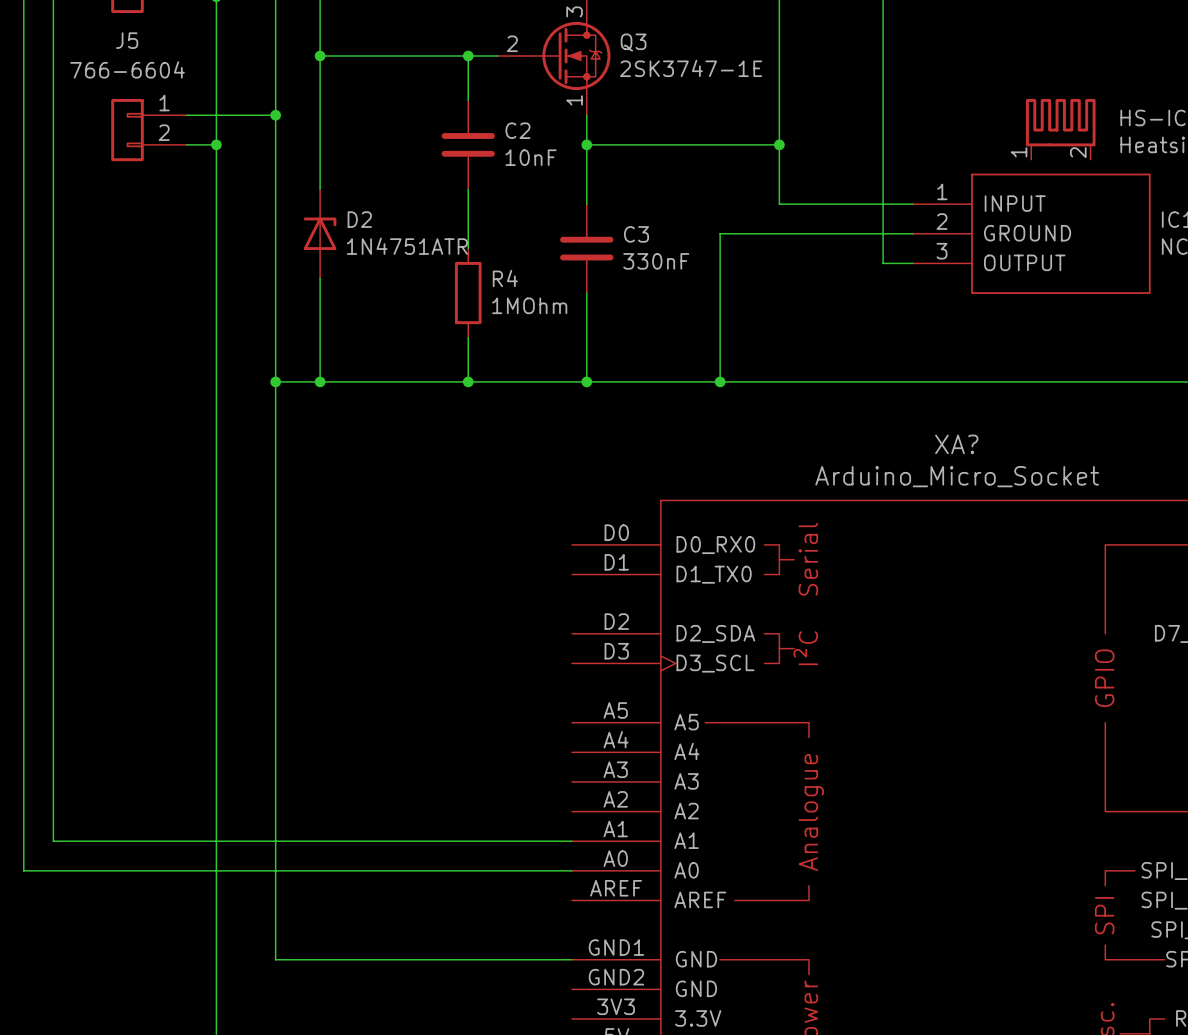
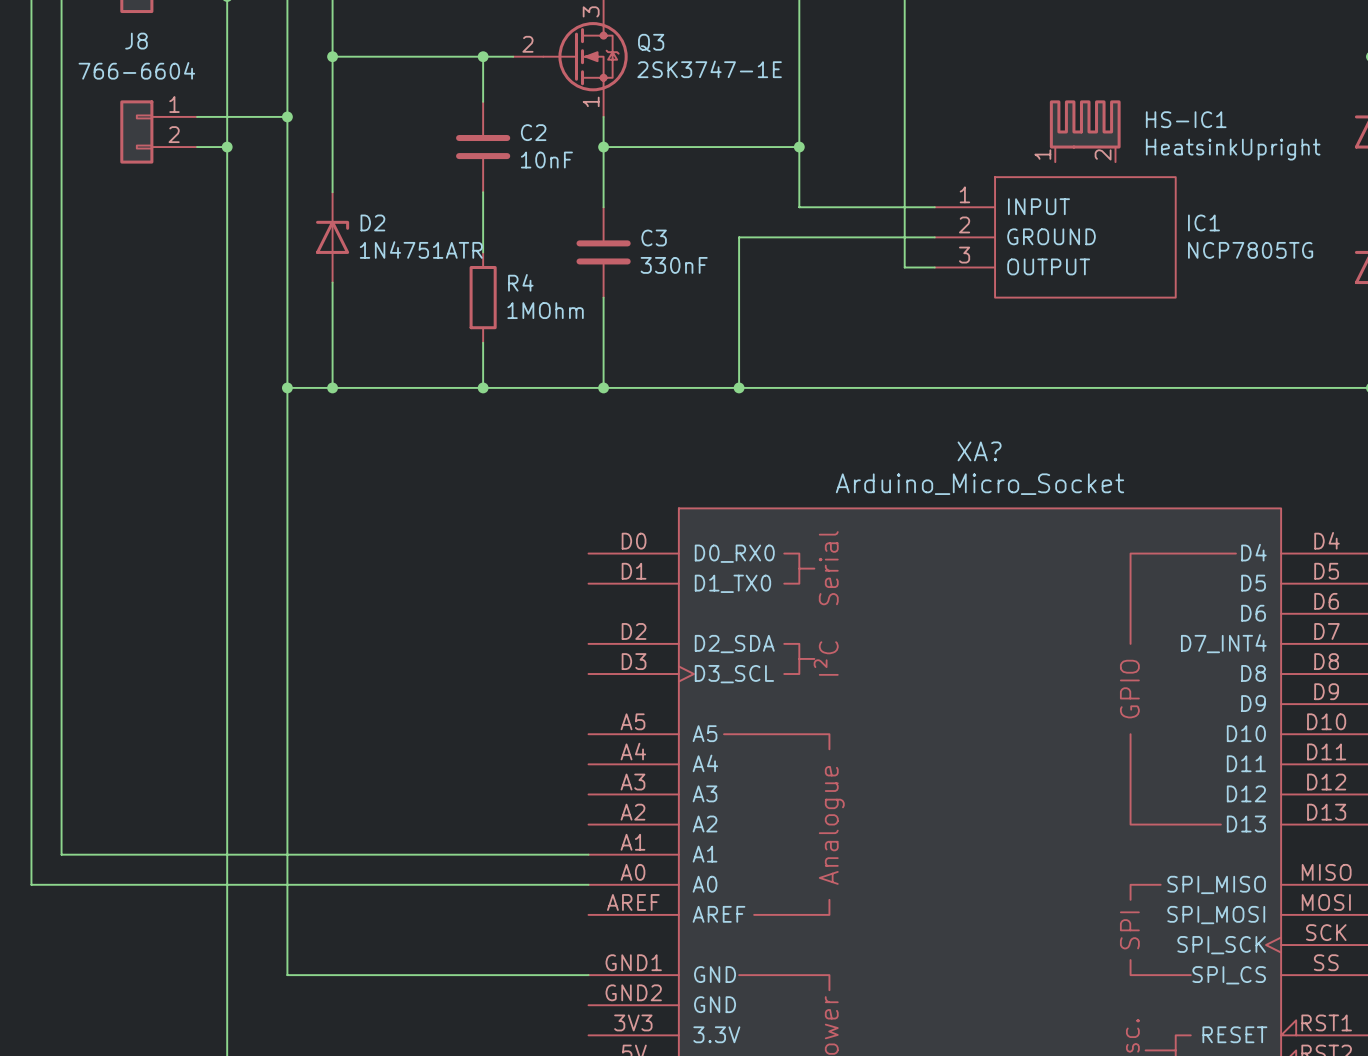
J5 name: J5 (127, 40) -> J8 (136, 41)

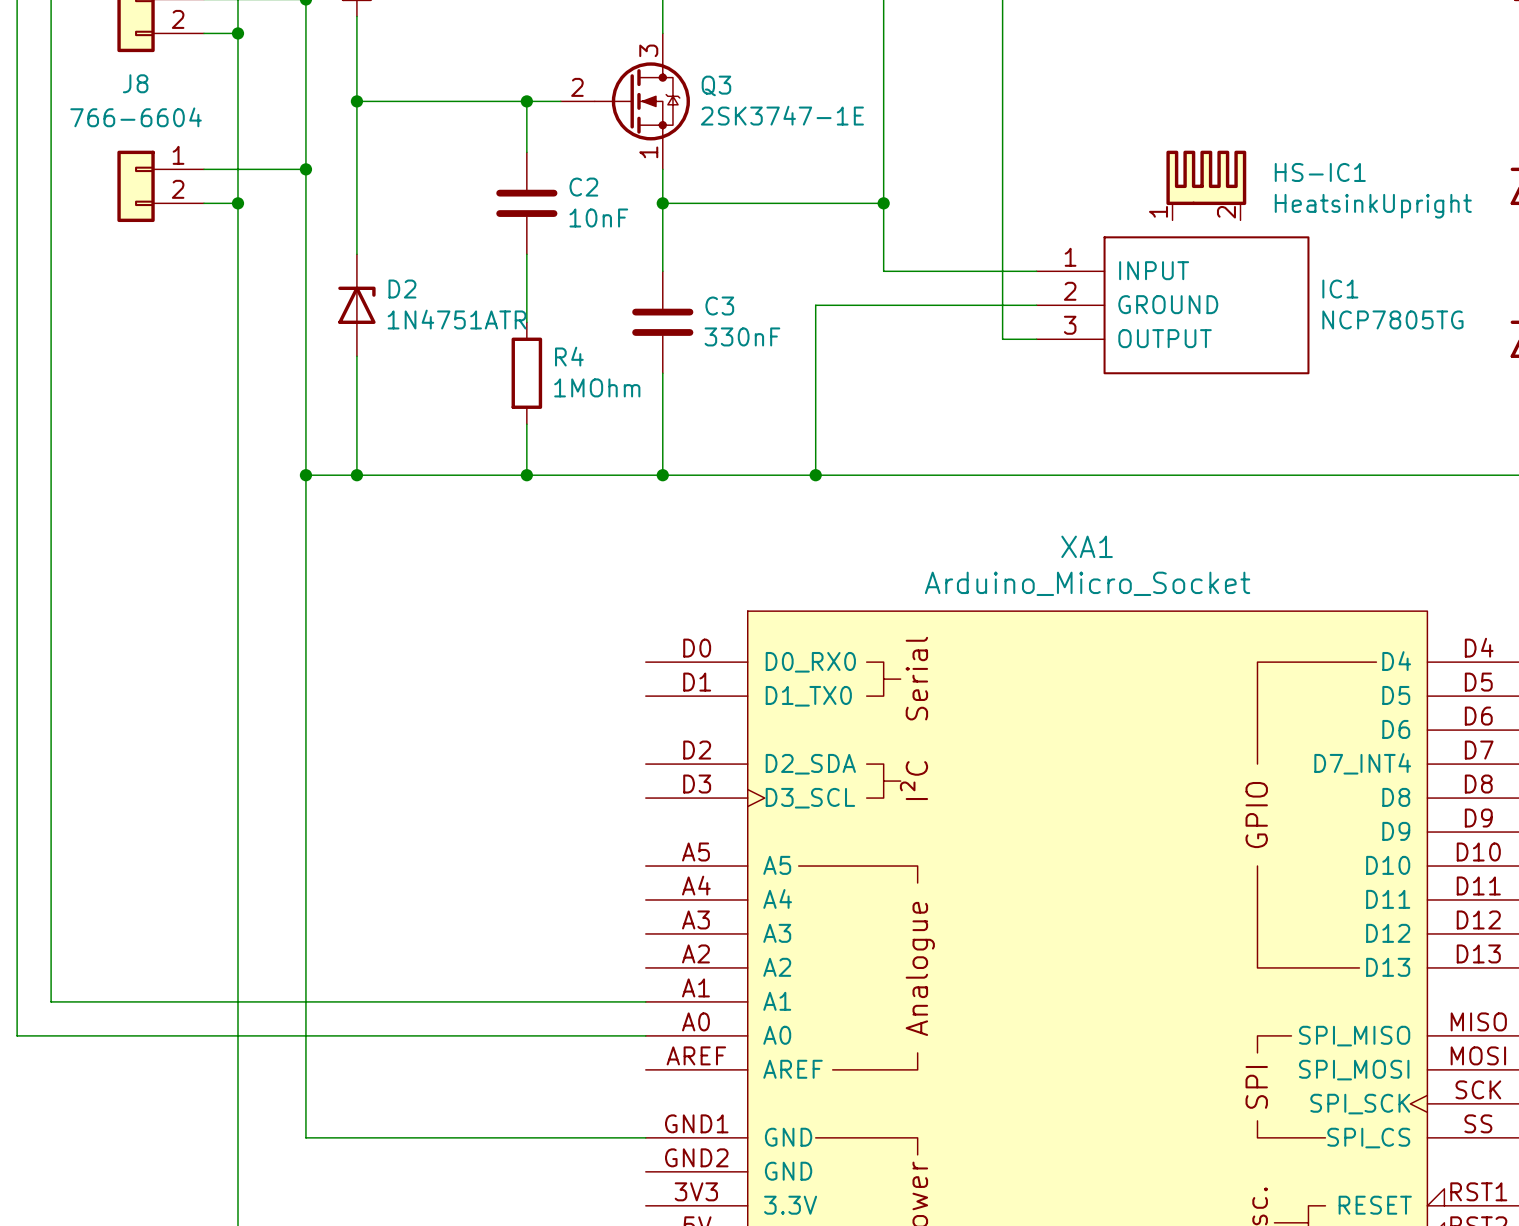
XA? name: XA? (979, 451) -> XA1 (1087, 546)

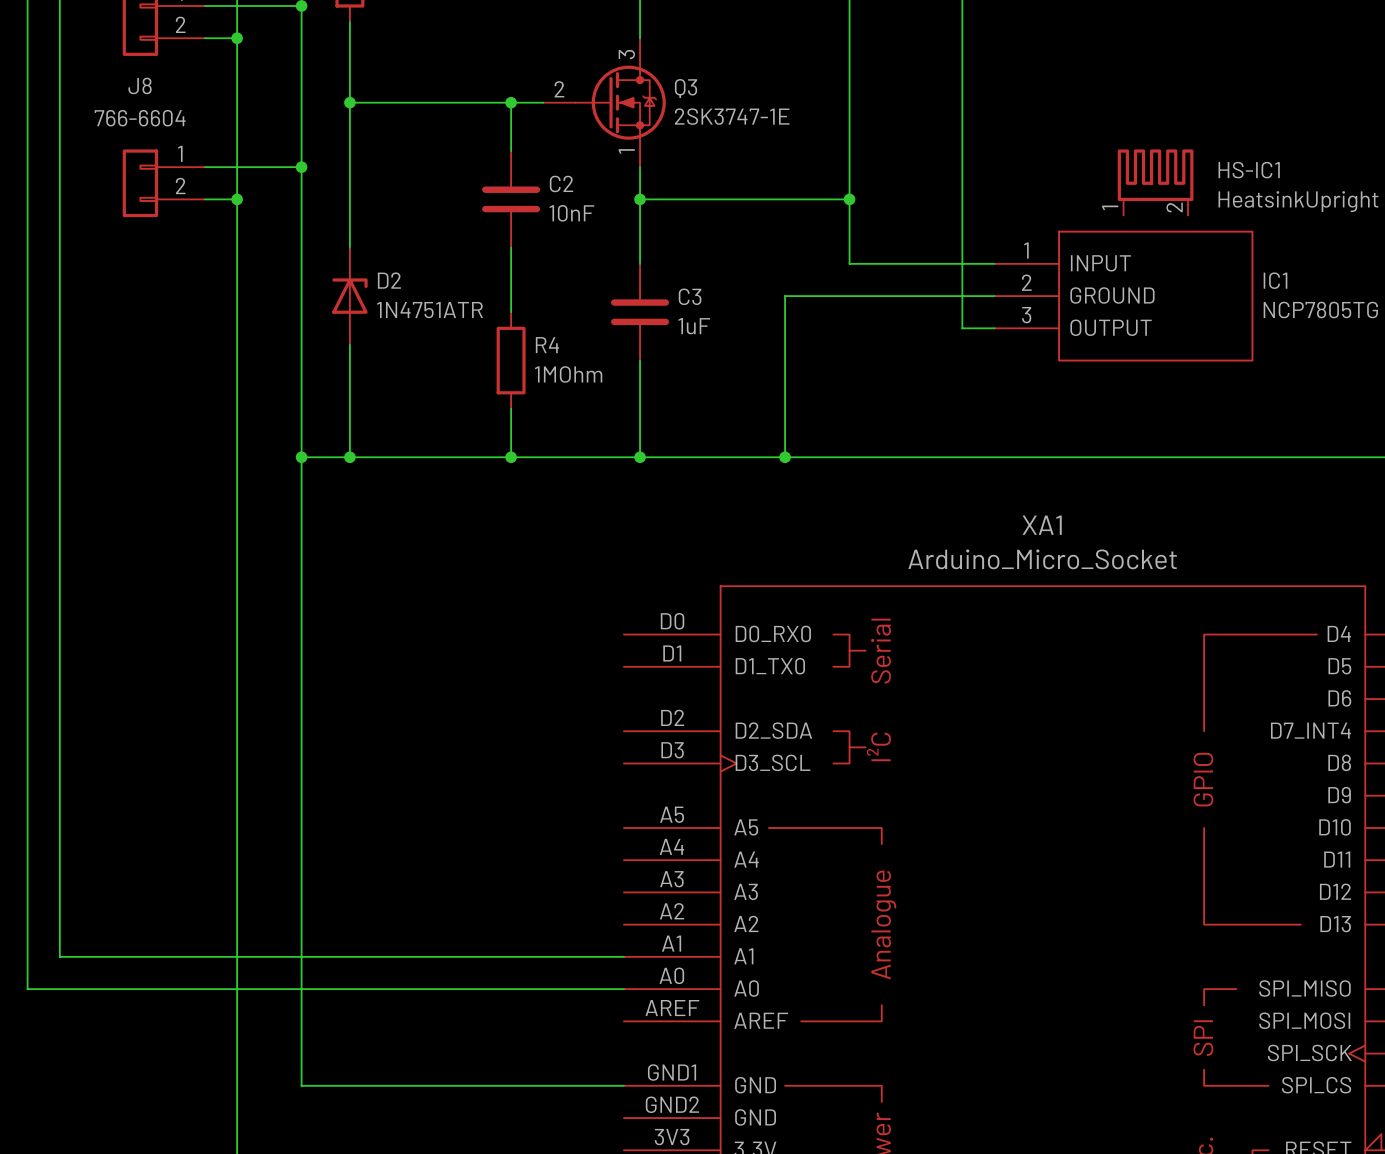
C3 value: 330nF (742, 336) -> 1uF (694, 326)

